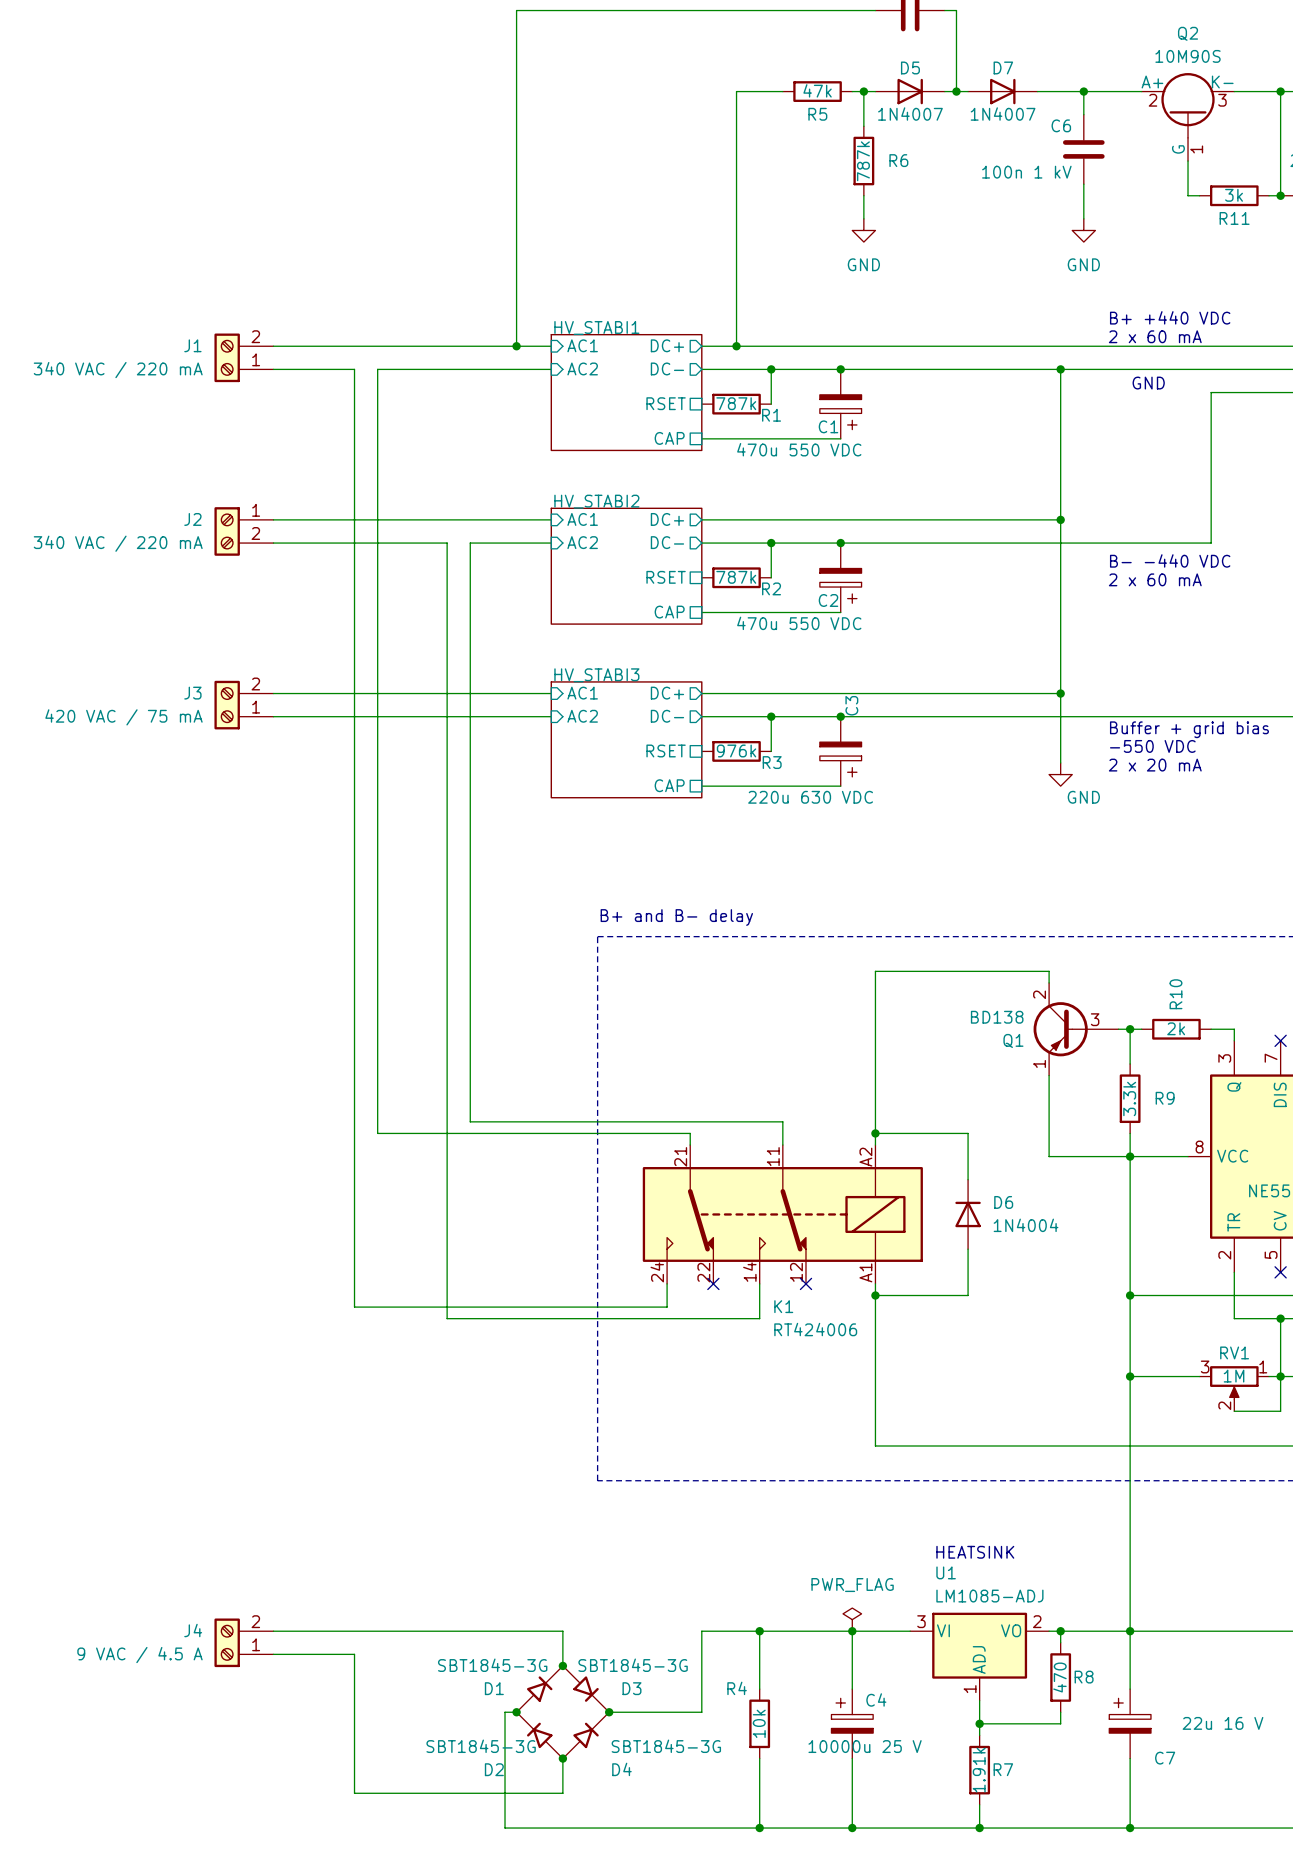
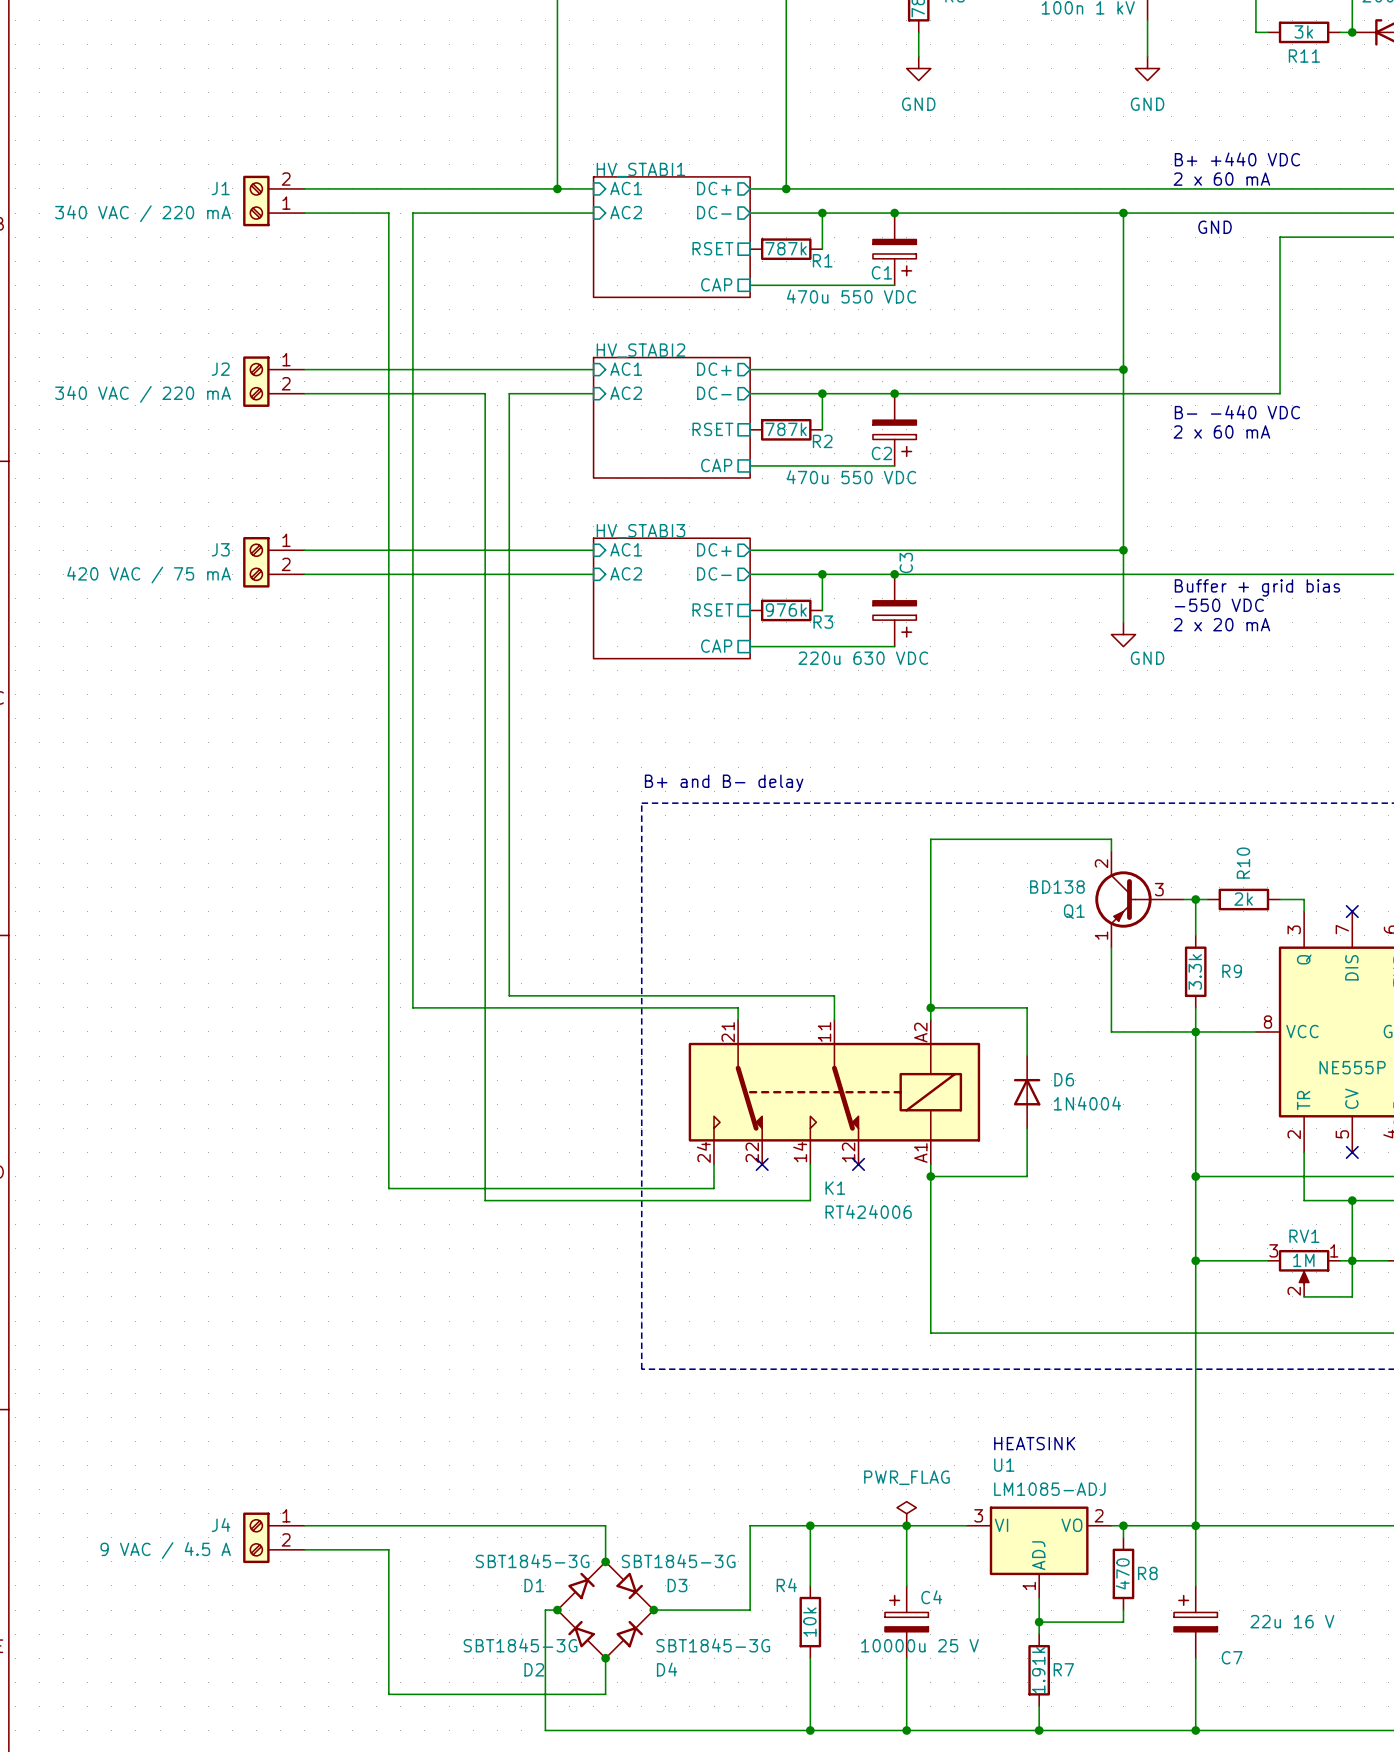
J3 flip: as is (227, 705) -> up-down (256, 562)
J4 flip: as is (227, 1642) -> up-down (256, 1537)

